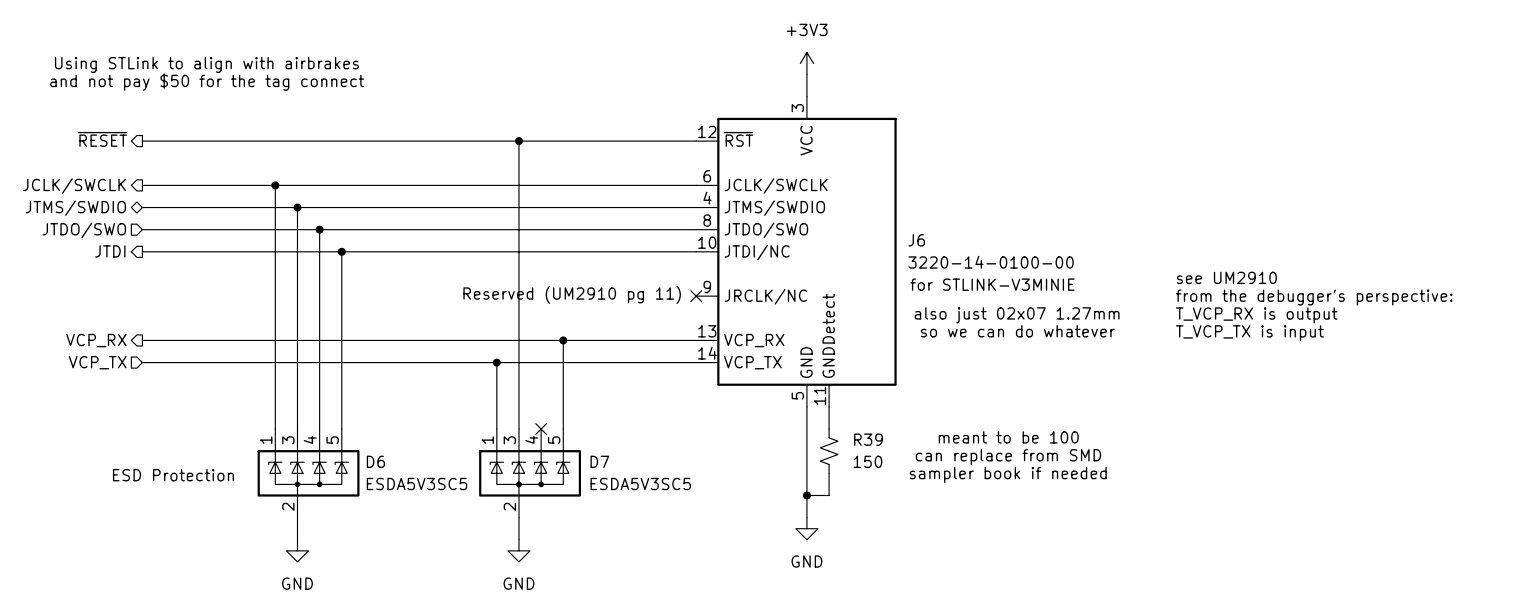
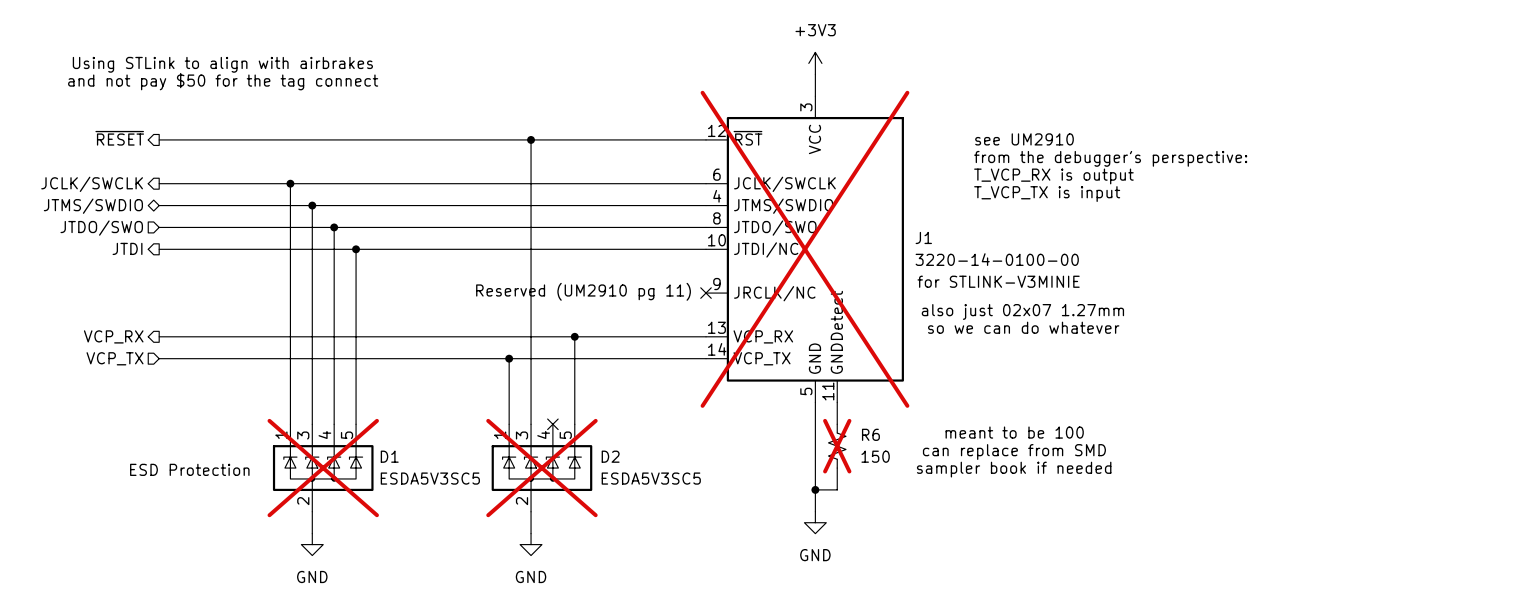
text: none -> see UM2910 (1024, 139)
text: none -> from the debugger's perspective: (1110, 158)
text: none -> T_VCP_RX is output (1053, 176)
text: none -> T_VCP_TX is input (1047, 194)
J6 name: J6 (916, 240) -> J1 (923, 237)
J6 do-not-place cross: none -> (804, 249)
text: see UM2910 (1226, 277) -> none
text: from the debugger's perspective: (1314, 297) -> none
text: T_VCP_RX is output (1256, 315) -> none
text: T_VCP_TX is input (1249, 333) -> none
R39 name: R39 (868, 439) -> R6 (870, 434)
R39 do-not-place cross: none -> (837, 446)
D6 name: D6 (375, 461) -> D1 (389, 456)
D7 name: D7 (599, 461) -> D2 (610, 456)
D6 do-not-place cross: none -> (323, 468)
D7 do-not-place cross: none -> (541, 468)

